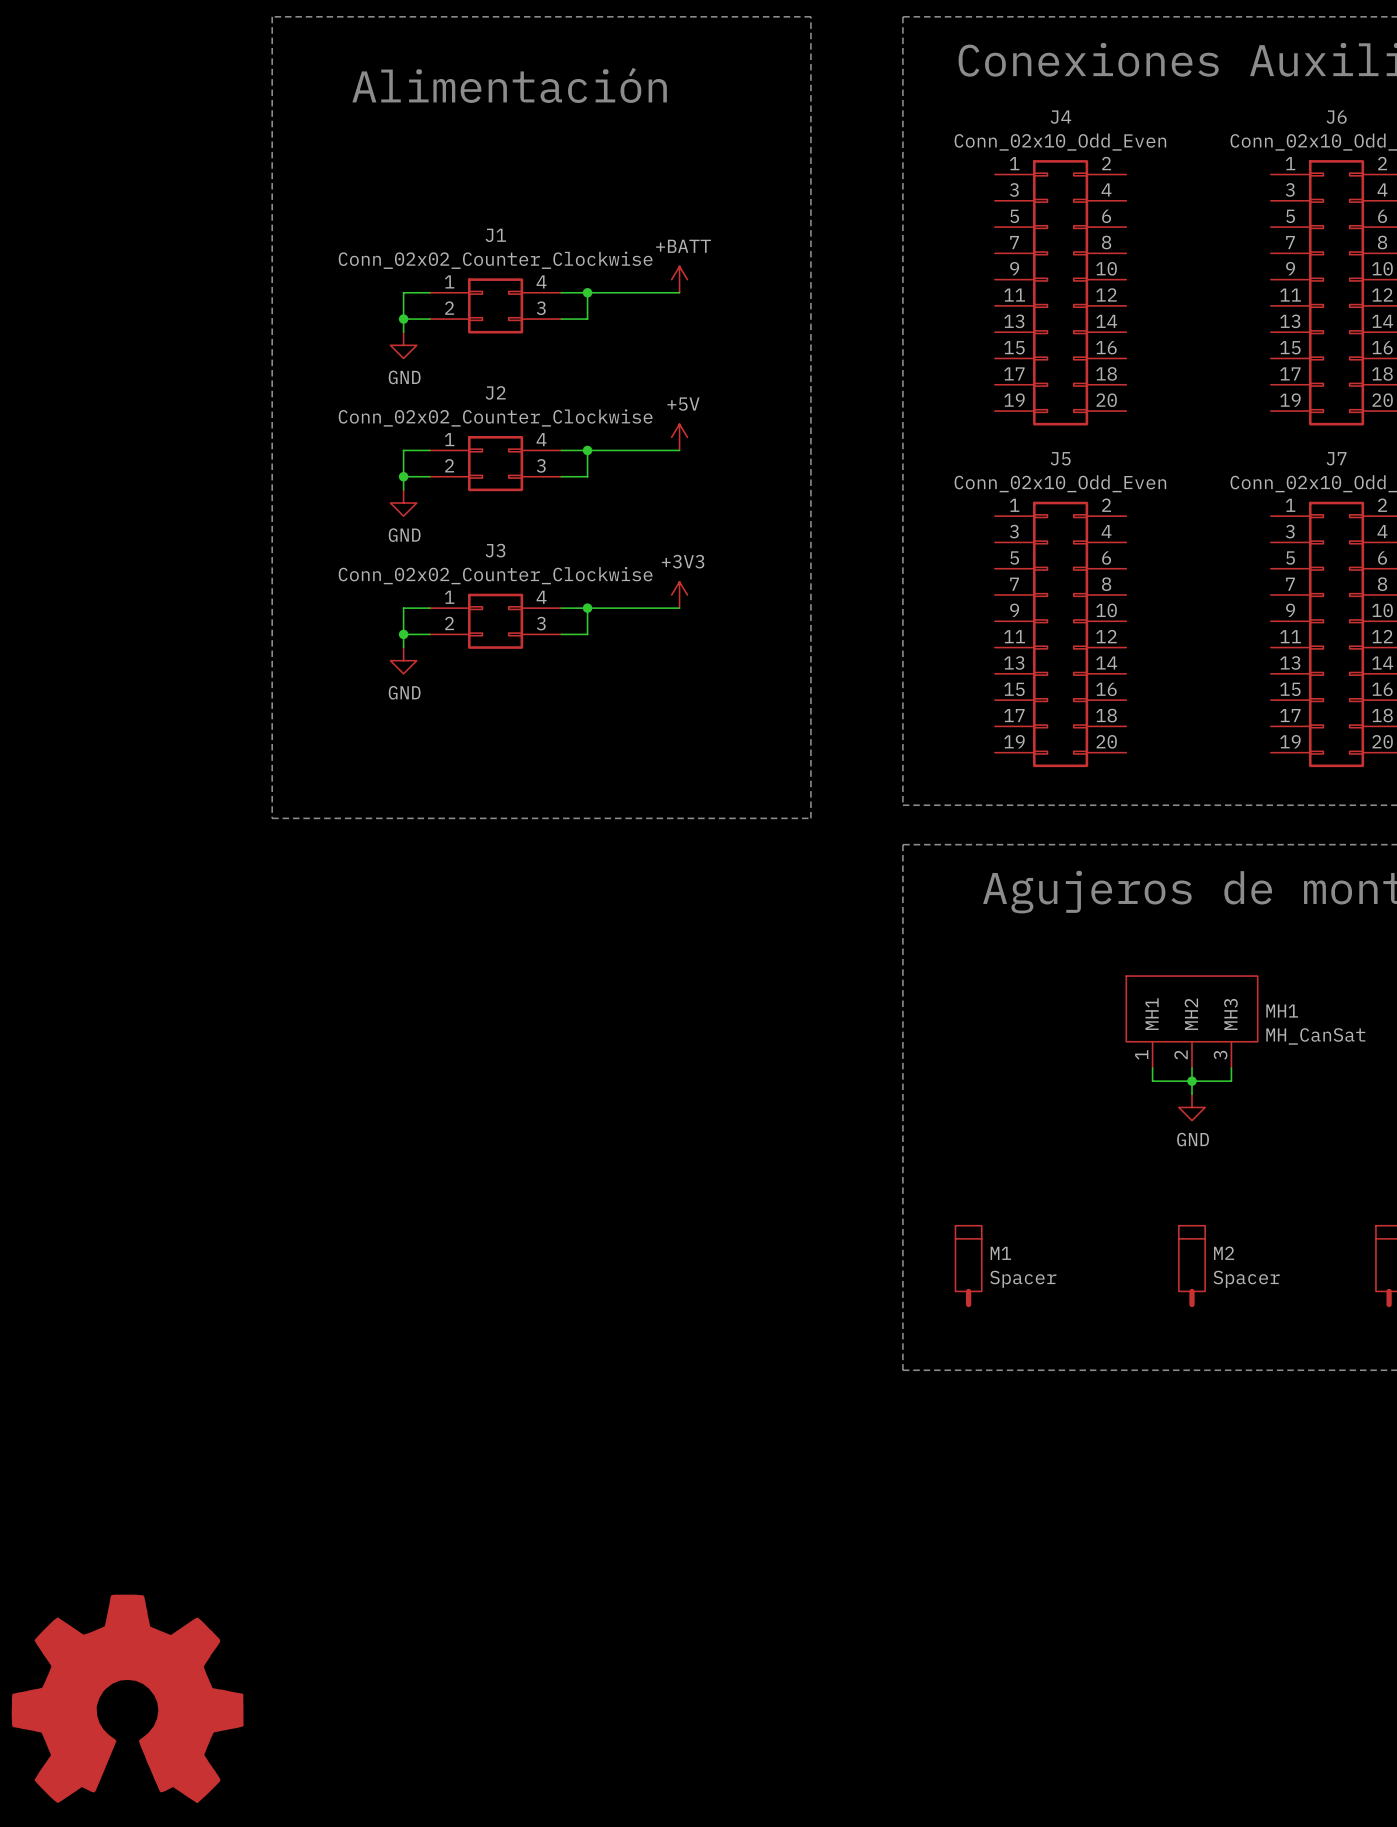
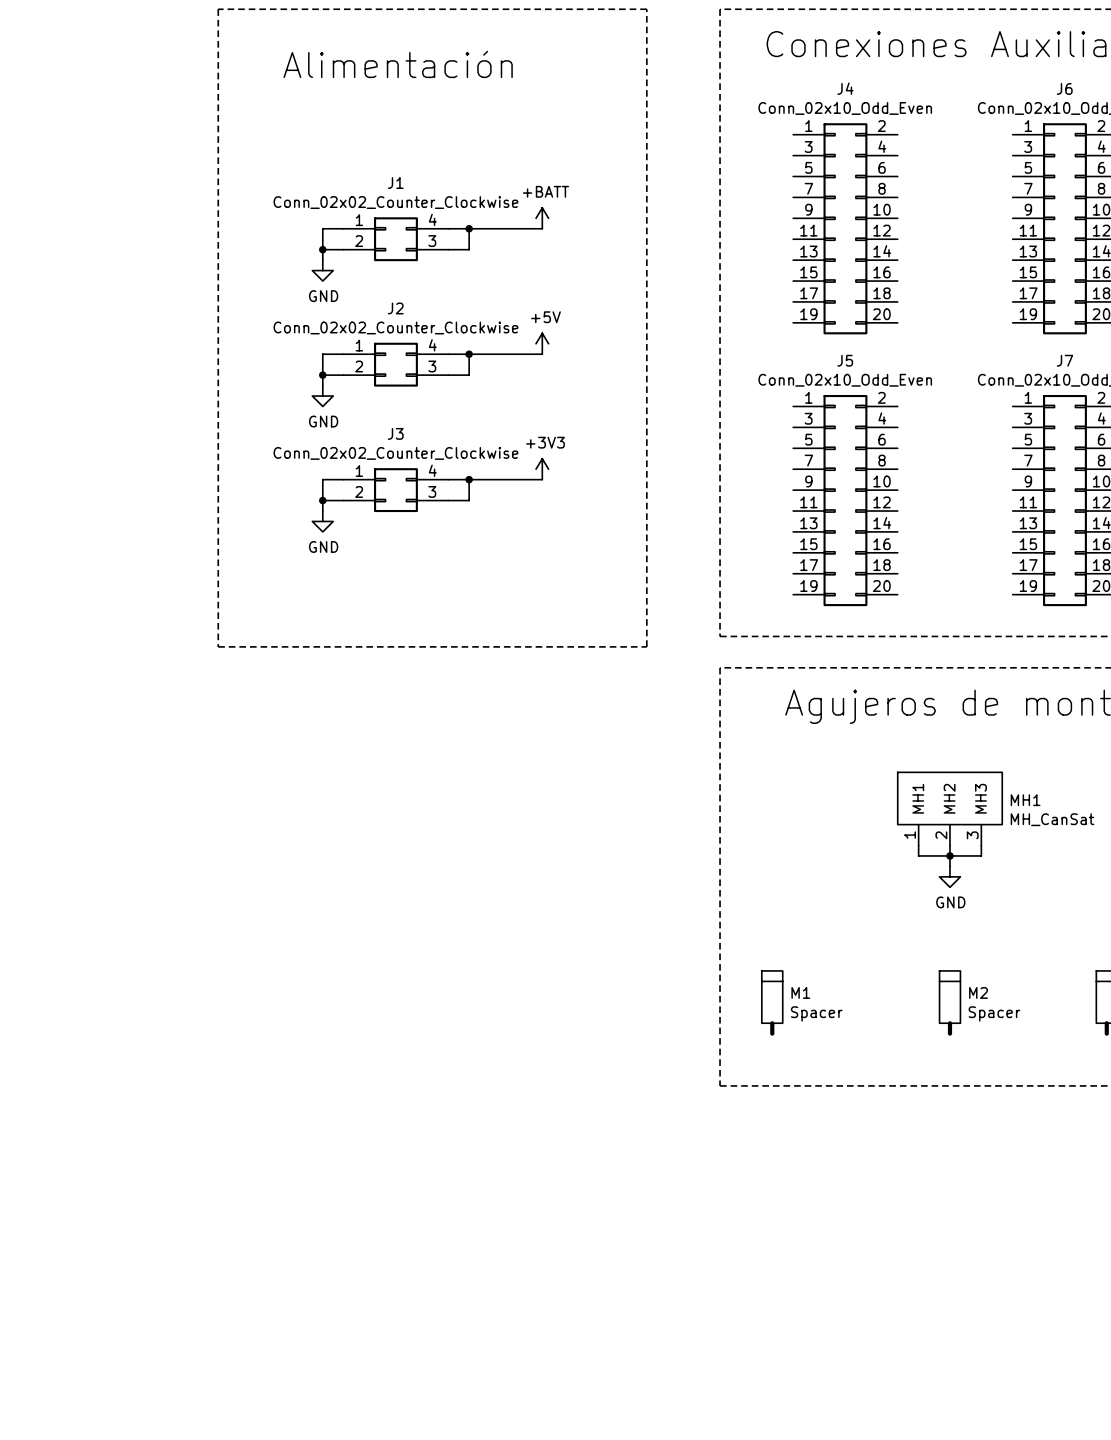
power symbol: (127, 1698) -> none

